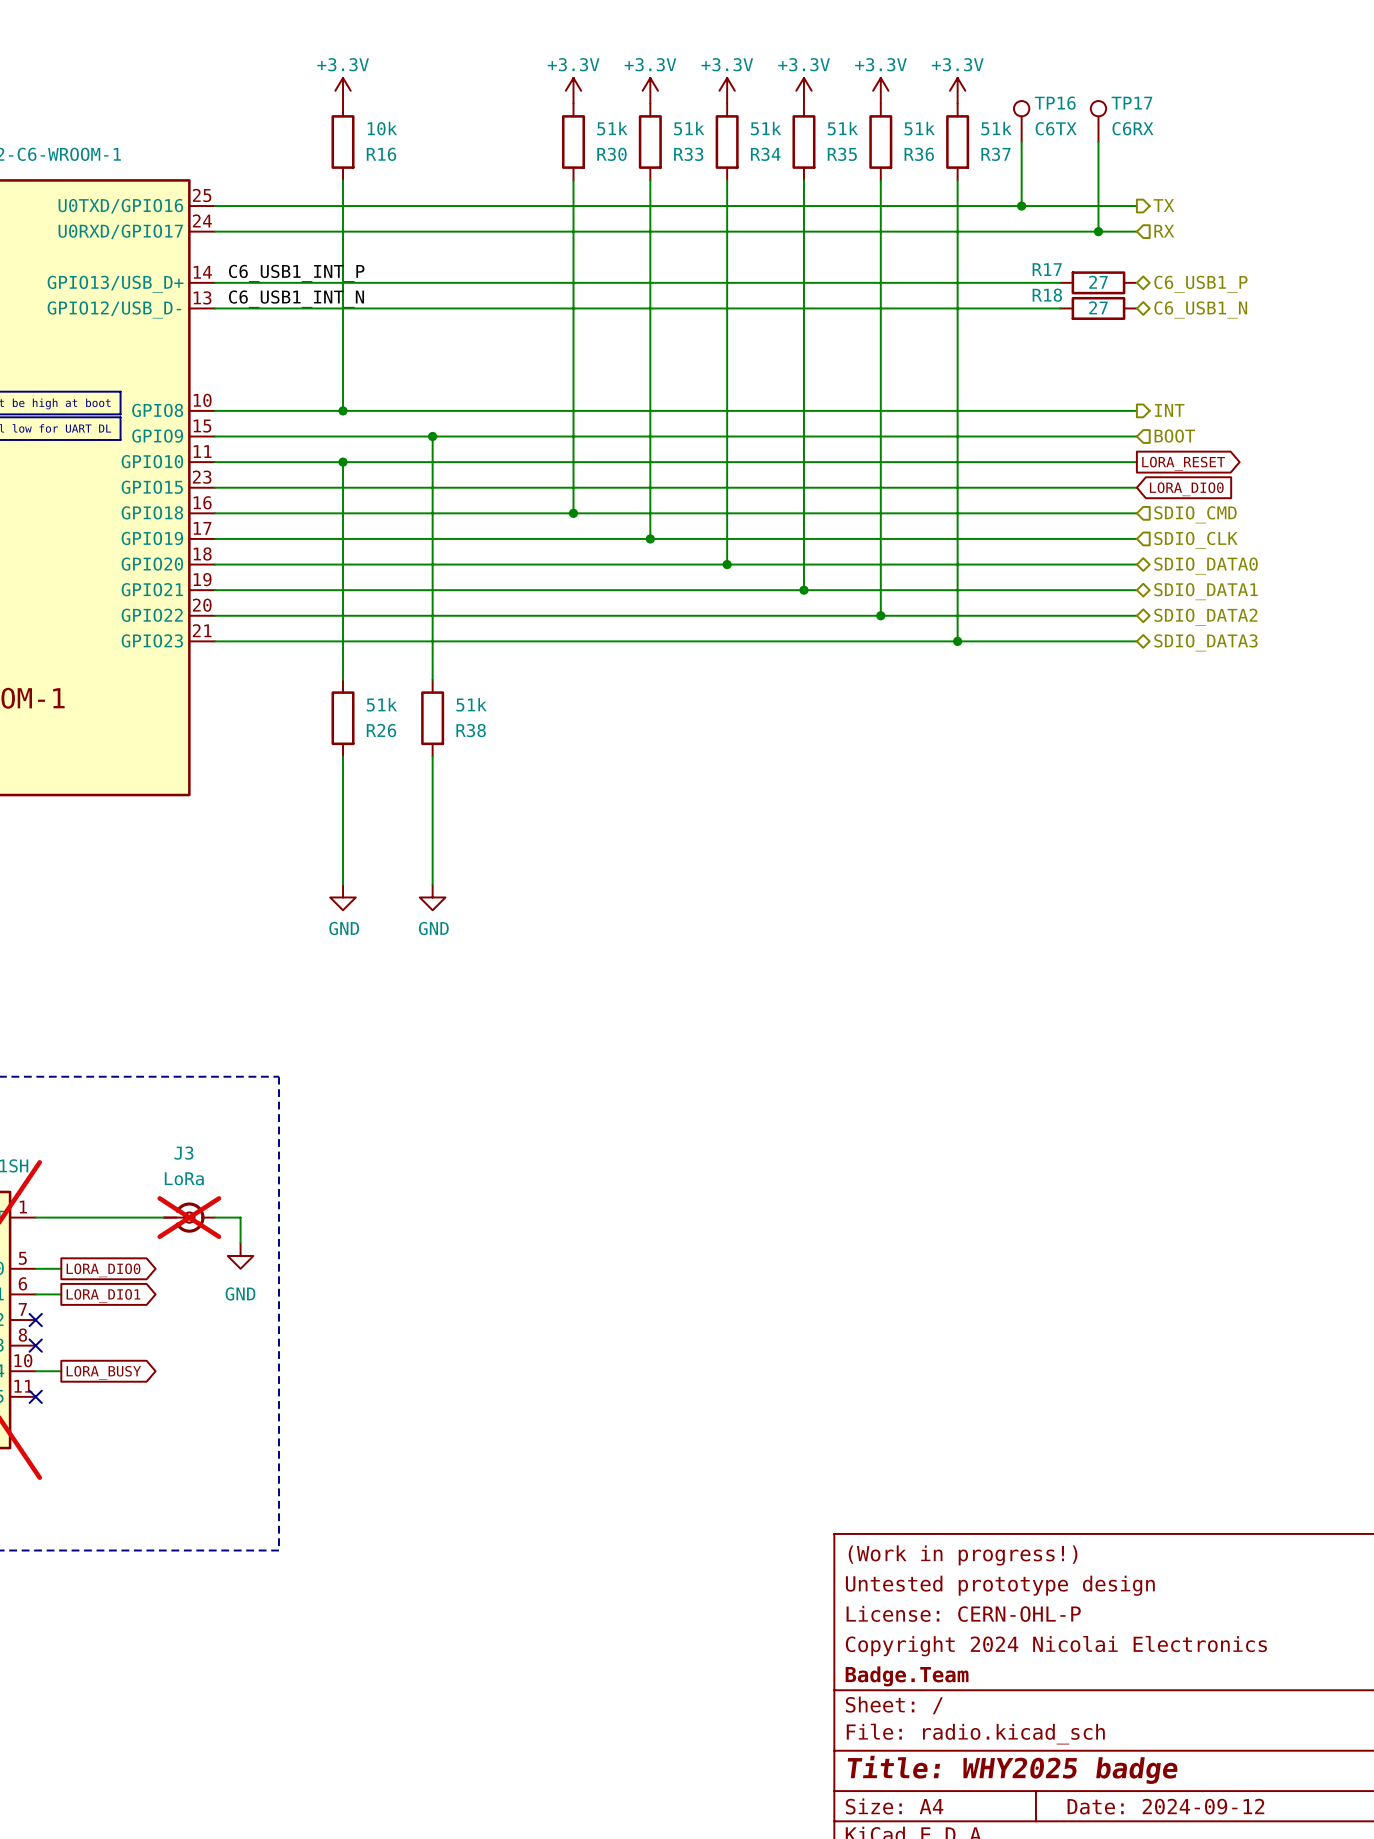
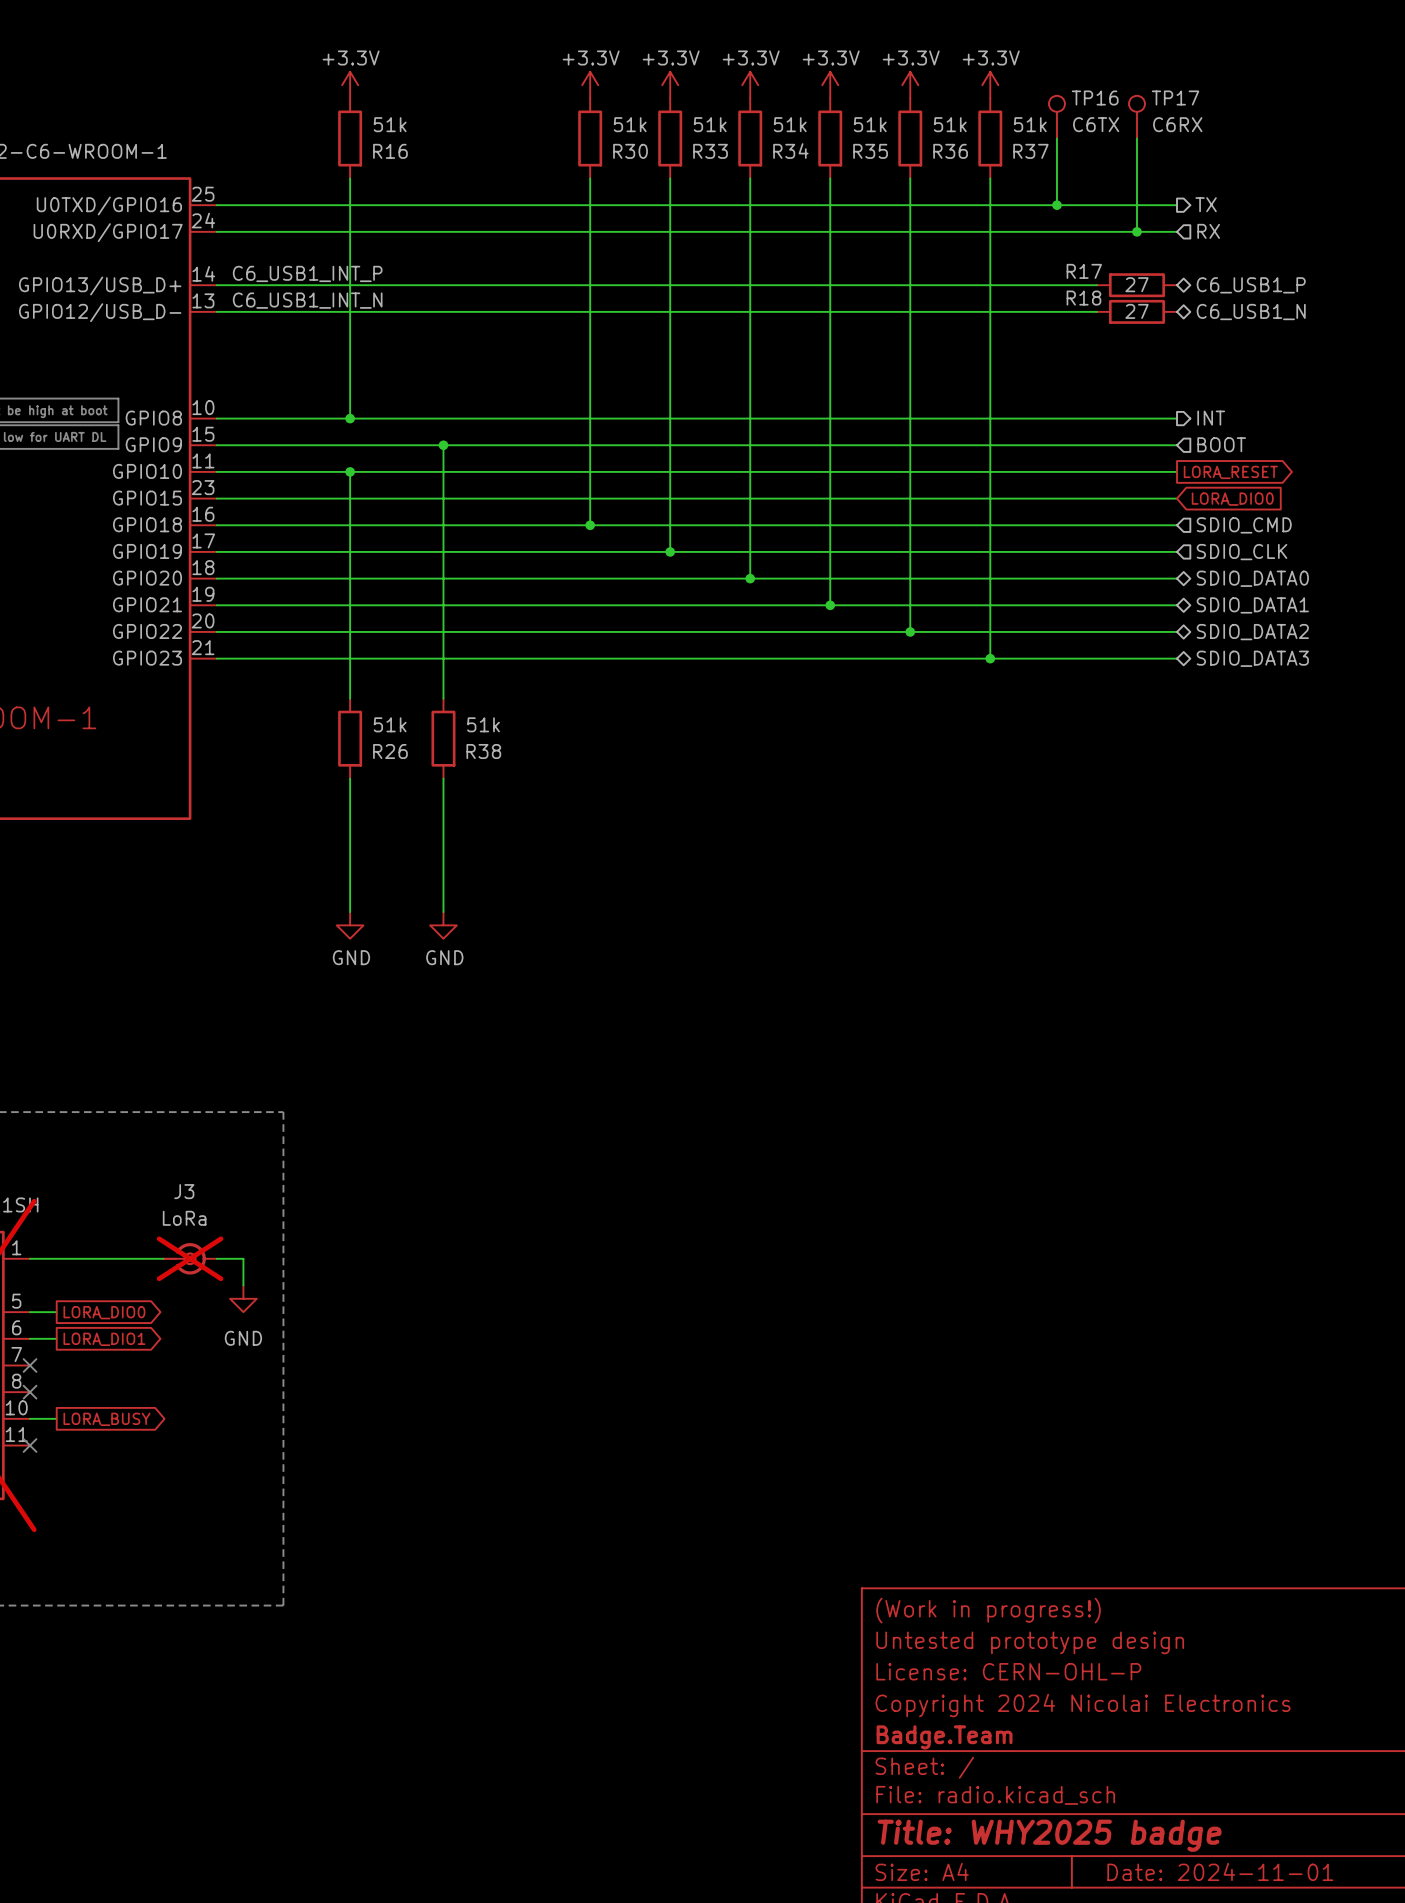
R16 value: 10k (382, 128) -> 51k (390, 124)
title block: Date: 2024-09-12 (1165, 1806) -> Date: 2024-11-01 (1220, 1871)

